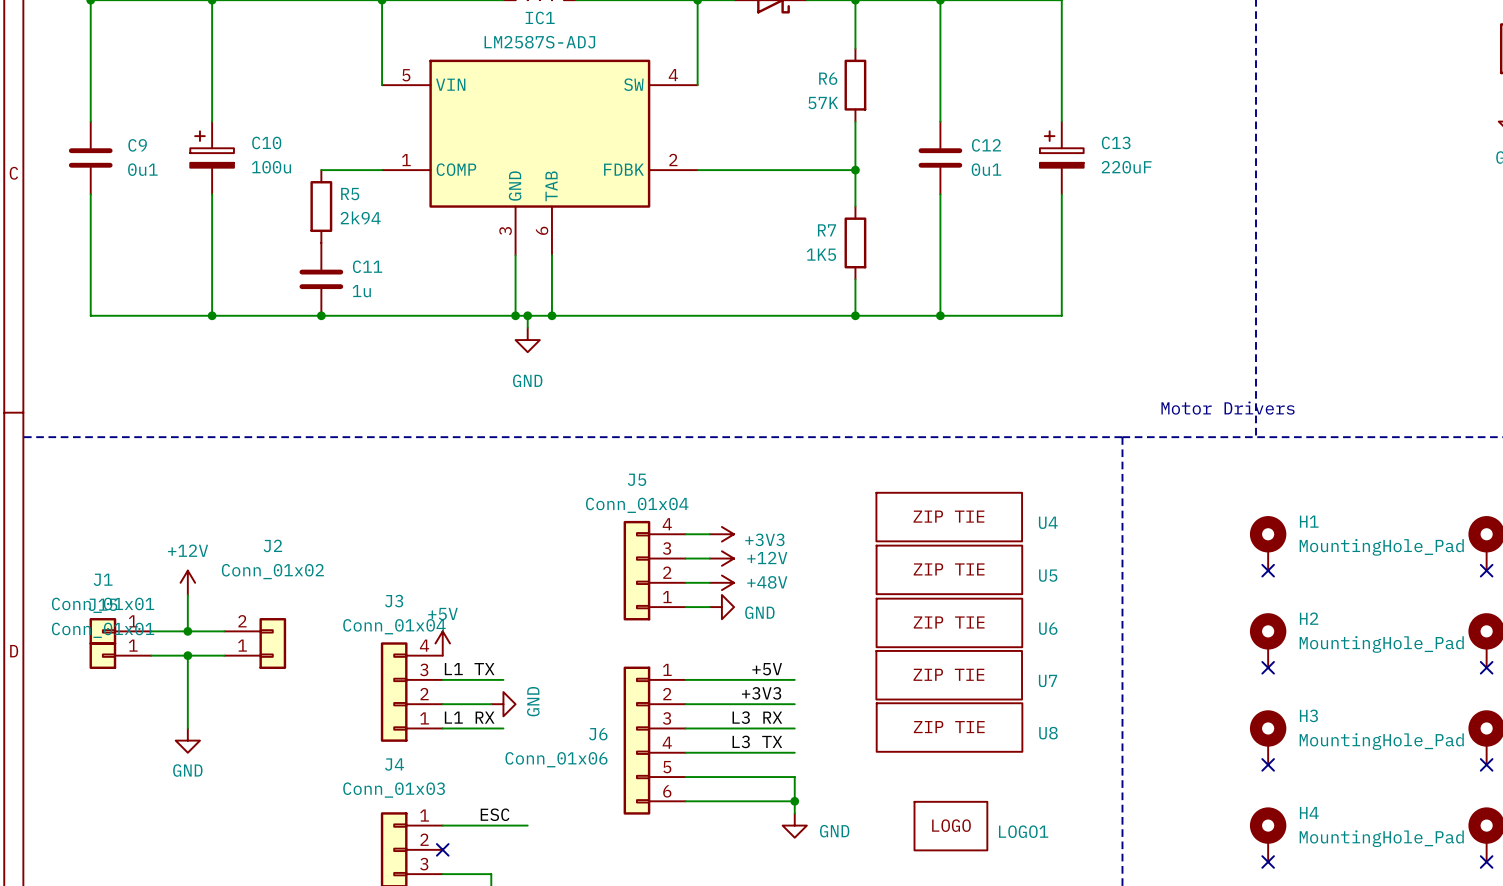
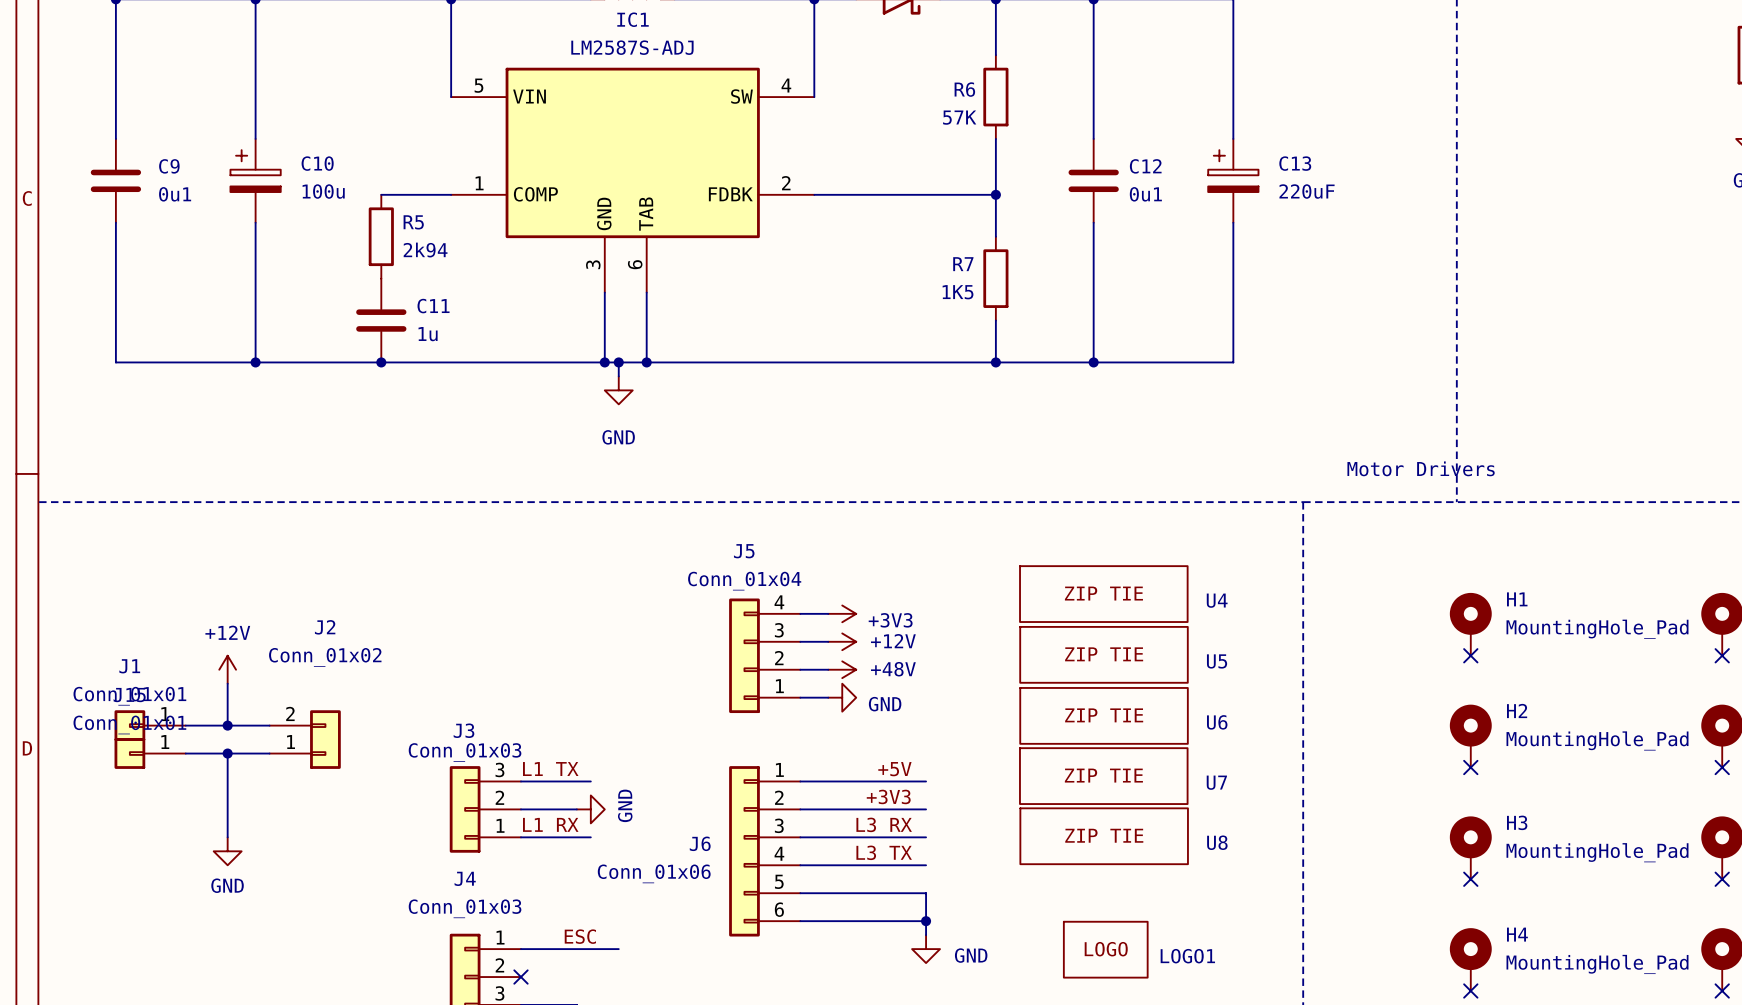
J3 name position: J3 (394, 601) -> J3 (463, 730)
J3 value: Conn_01x04 (394, 626) -> Conn_01x03 (465, 752)
J3 symbol: [380, 642, 443, 742] -> [449, 766, 521, 853]
power symbol: +5V (442, 643) -> none

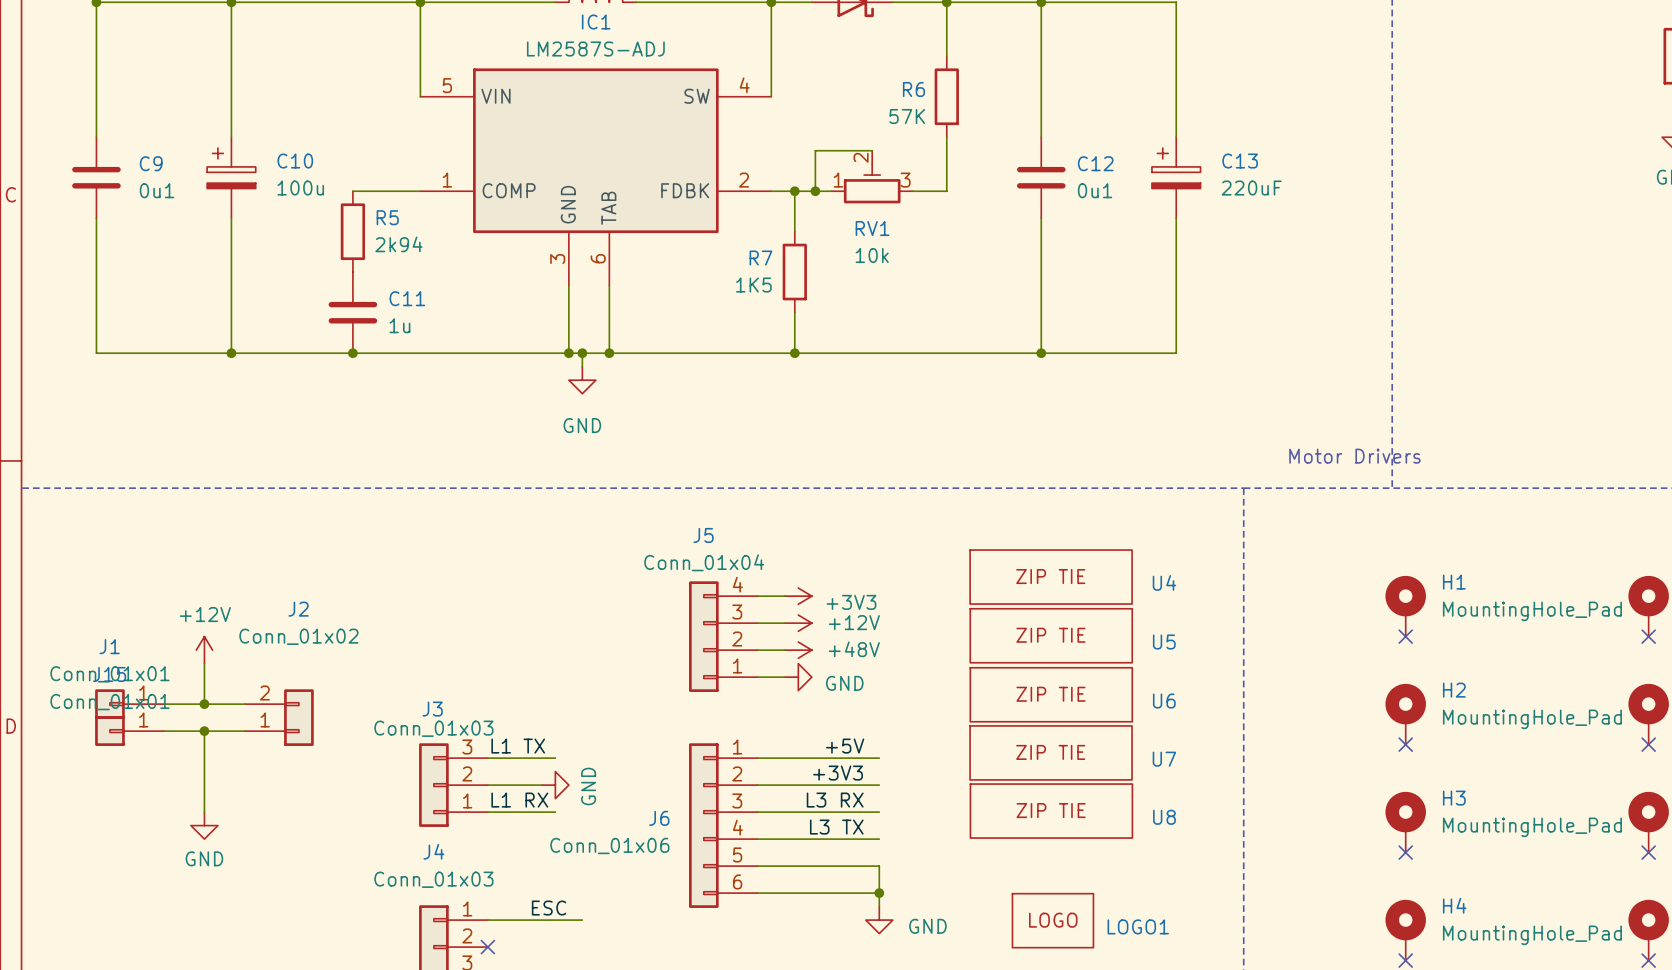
wire: none -> (872, 150) (815, 150) (815, 191)
RV1: none -> 10k (872, 177)
junction: none -> (794, 191)
junction: none -> (815, 191)
wire: (876, 194) (960, 194) -> none
wire: (995, 194) (995, 236) -> (794, 191) (794, 231)
junction: (995, 194) -> none
R7 position: (995, 278) -> (794, 272)
wire: (995, 320) (995, 362) -> (794, 312) (794, 353)
junction: none -> (794, 353)
junction: (995, 362) -> none

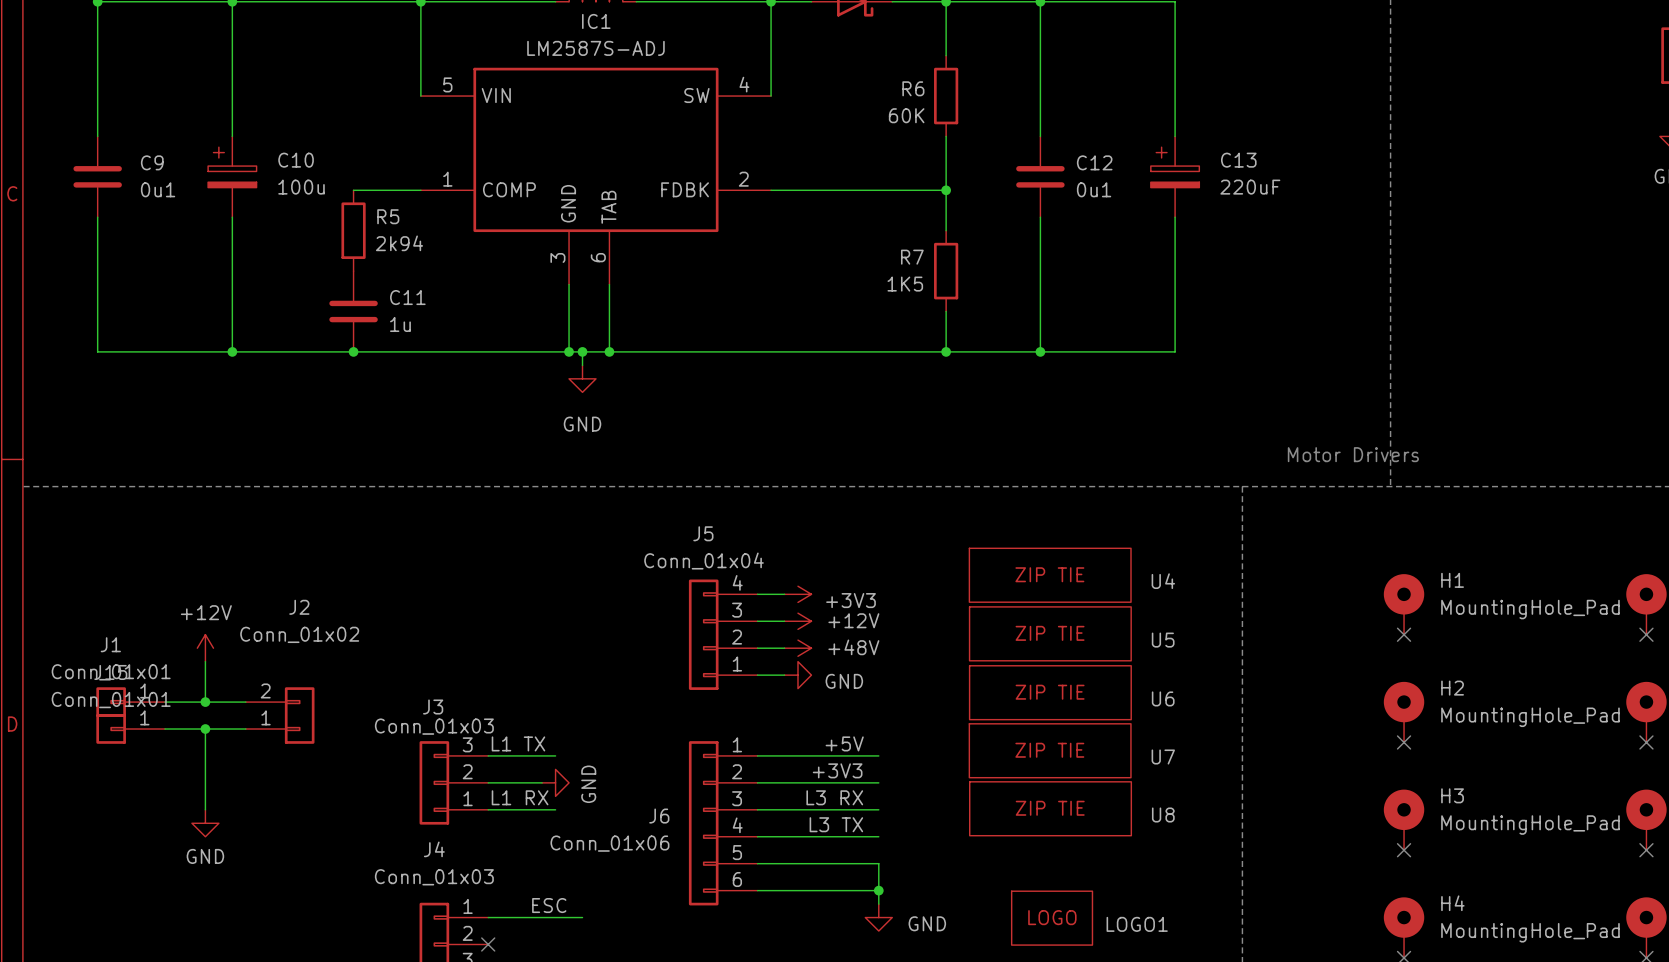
R6 value: 57K (907, 116) -> 60K (906, 115)
wire: (872, 150) (815, 150) (815, 191) -> none
RV1: 10k (872, 177) -> none
wire: (794, 191) (794, 231) -> (946, 190) (946, 230)
junction: (794, 191) -> none
junction: (815, 191) -> none
wire: none -> (831, 190) (912, 190)
junction: none -> (946, 190)
R7 position: (794, 272) -> (946, 271)
wire: (794, 312) (794, 353) -> (946, 311) (946, 351)
junction: (794, 353) -> none
junction: none -> (946, 351)

